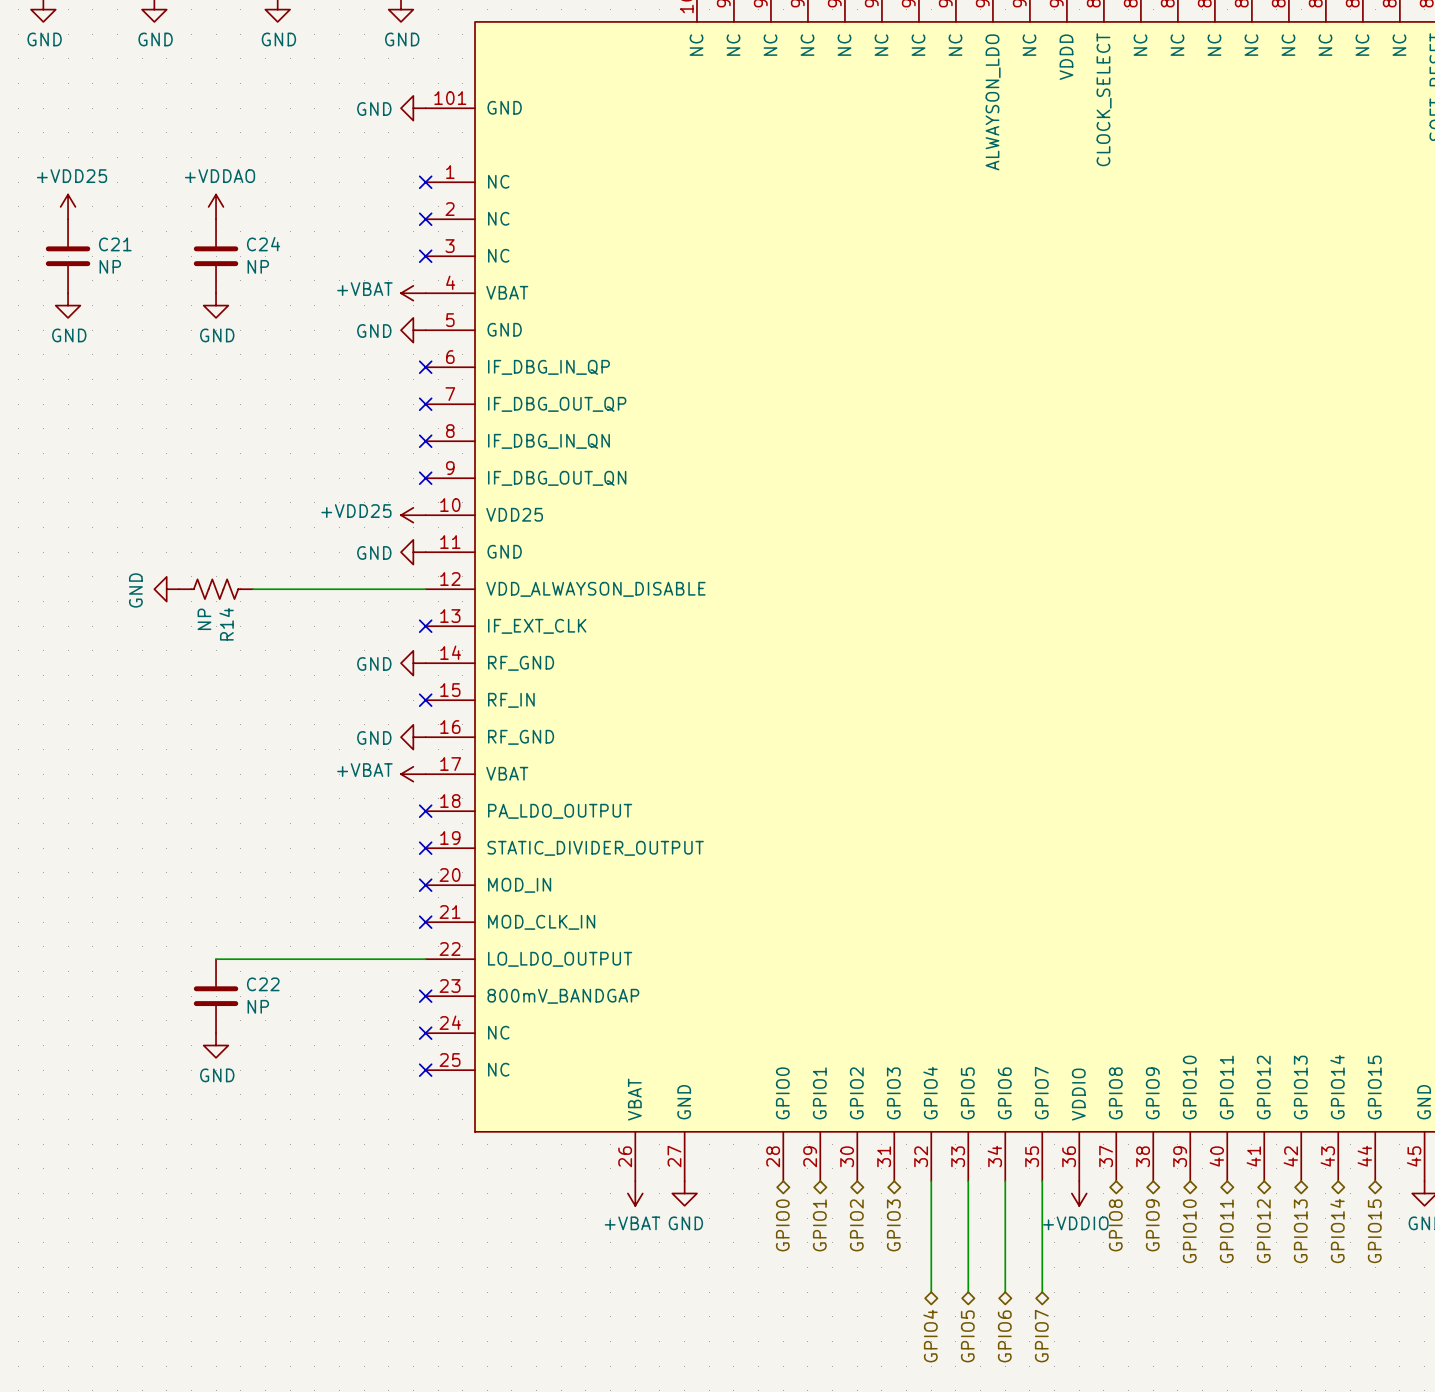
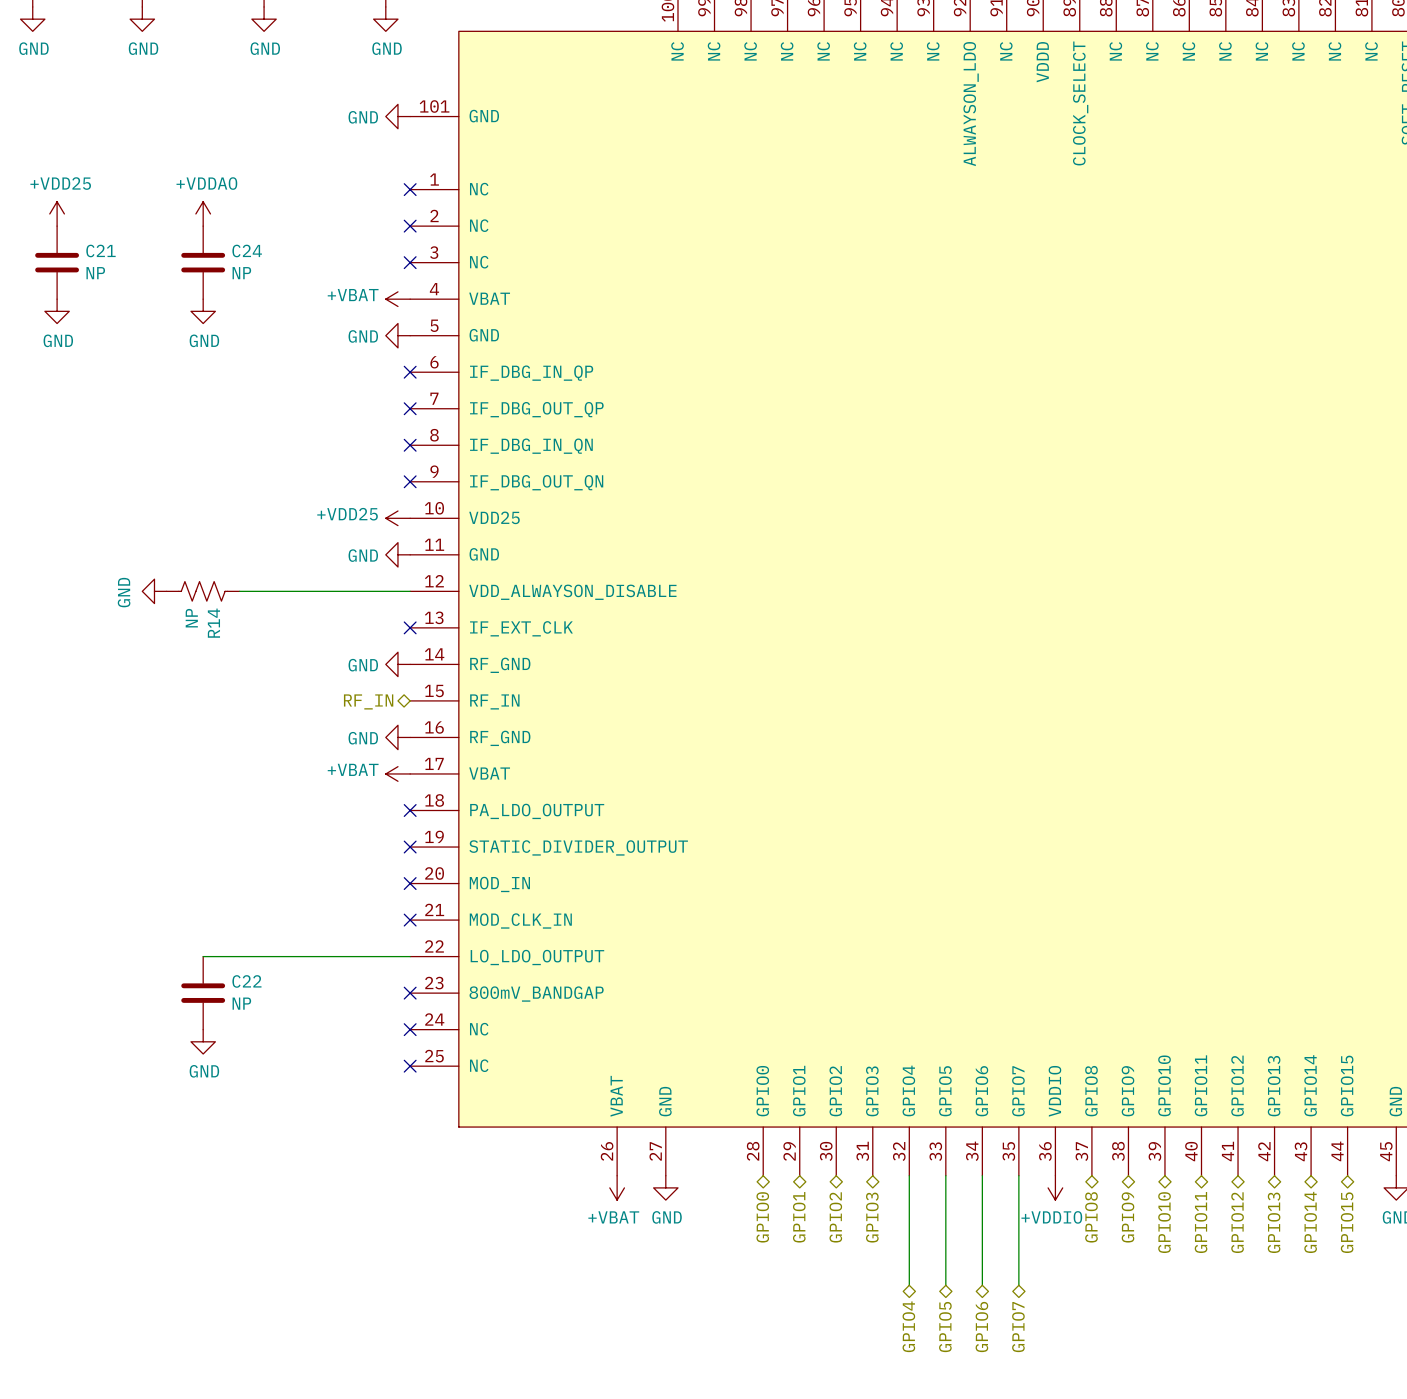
hierarchical label: none -> RF_IN (368, 701)
no-connect mark: (425, 700) -> none

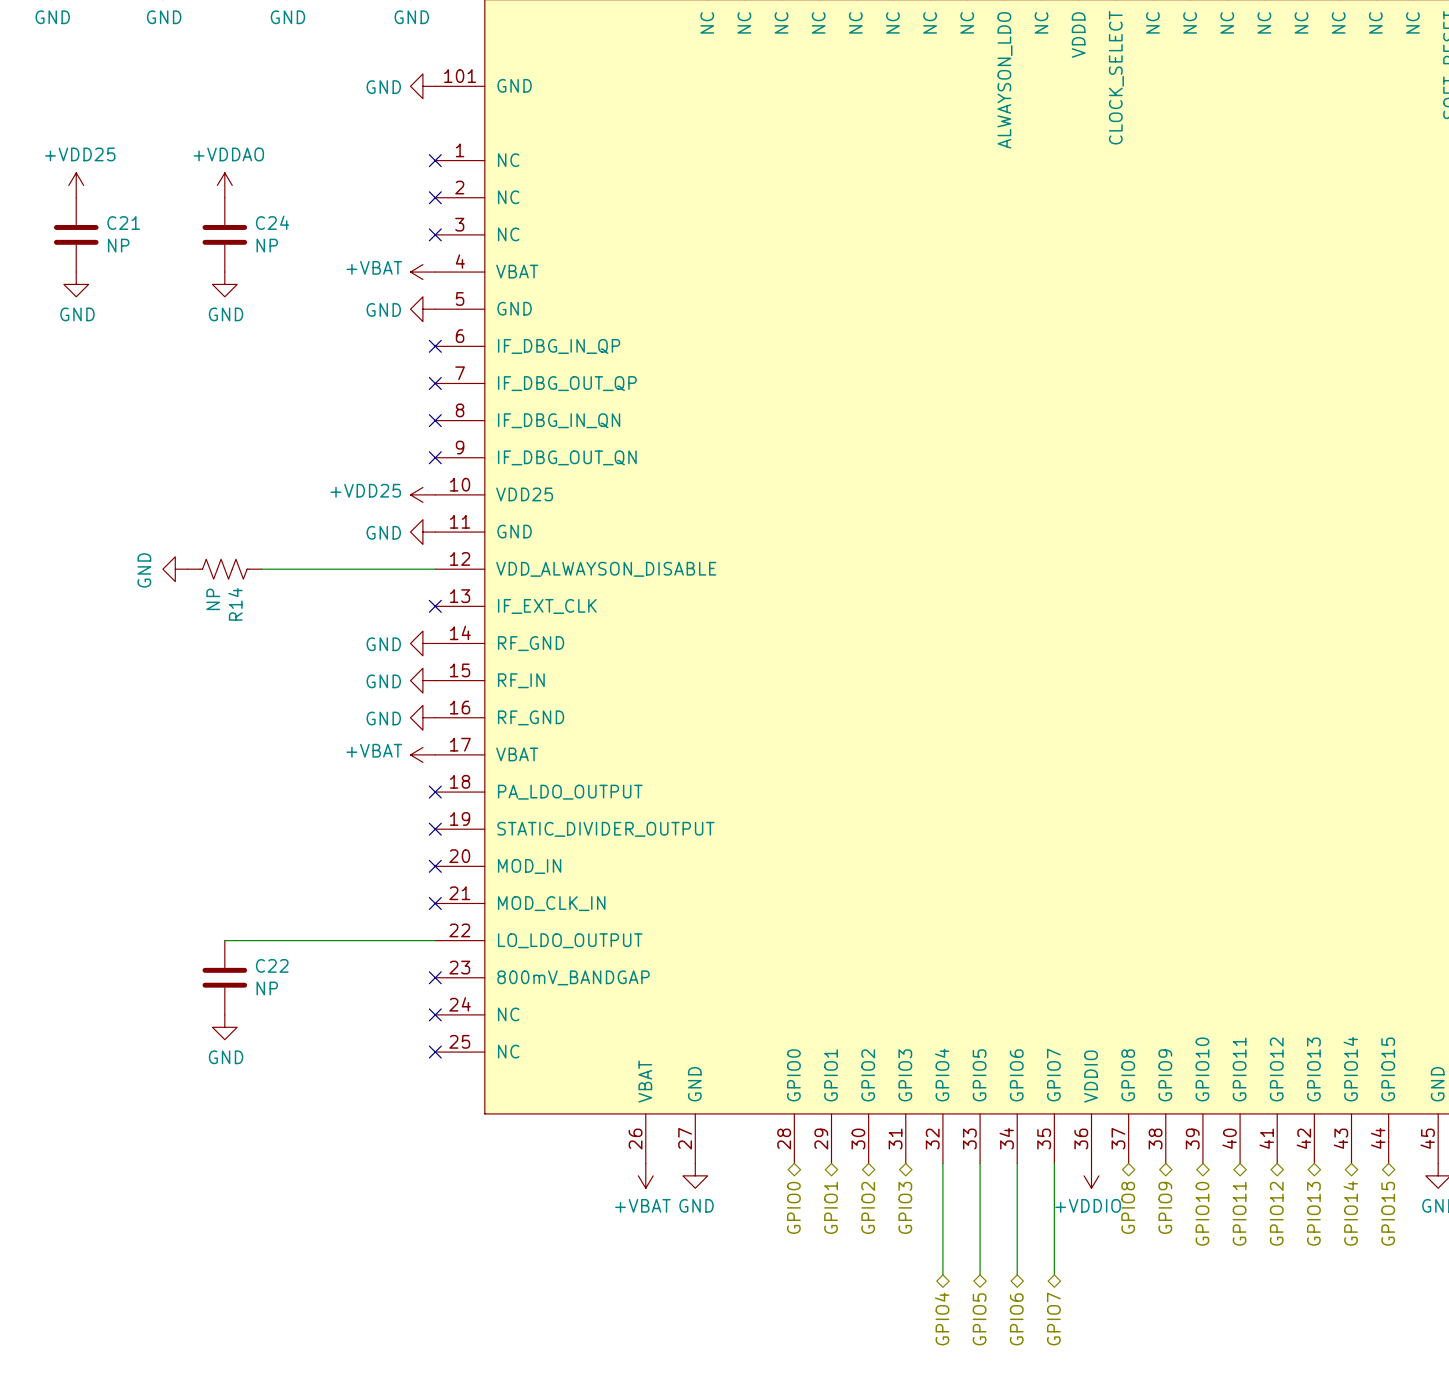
power symbol: none -> GND (422, 680)
hierarchical label: RF_IN (368, 701) -> none

